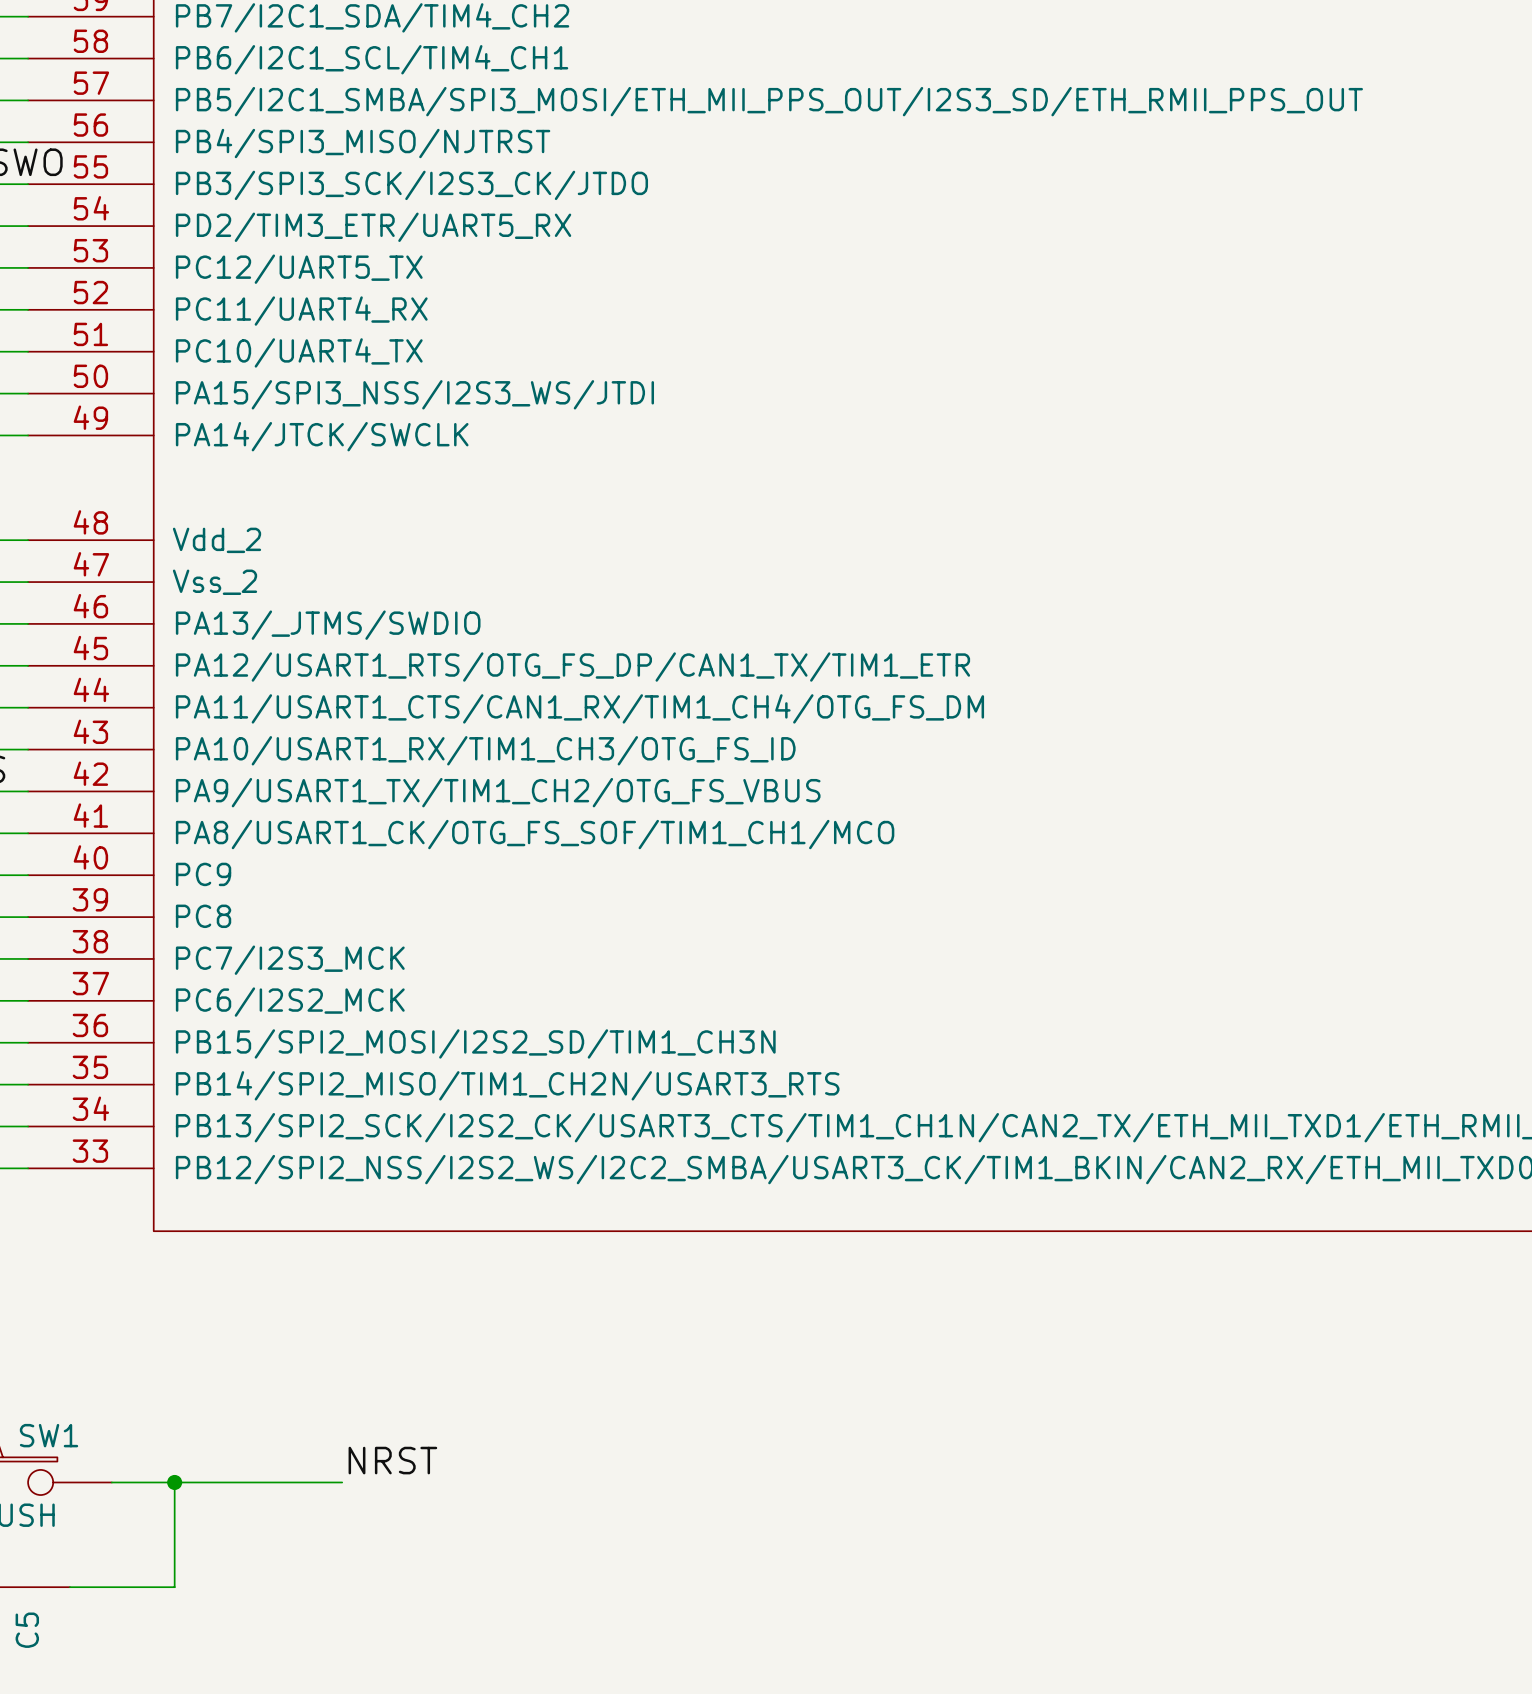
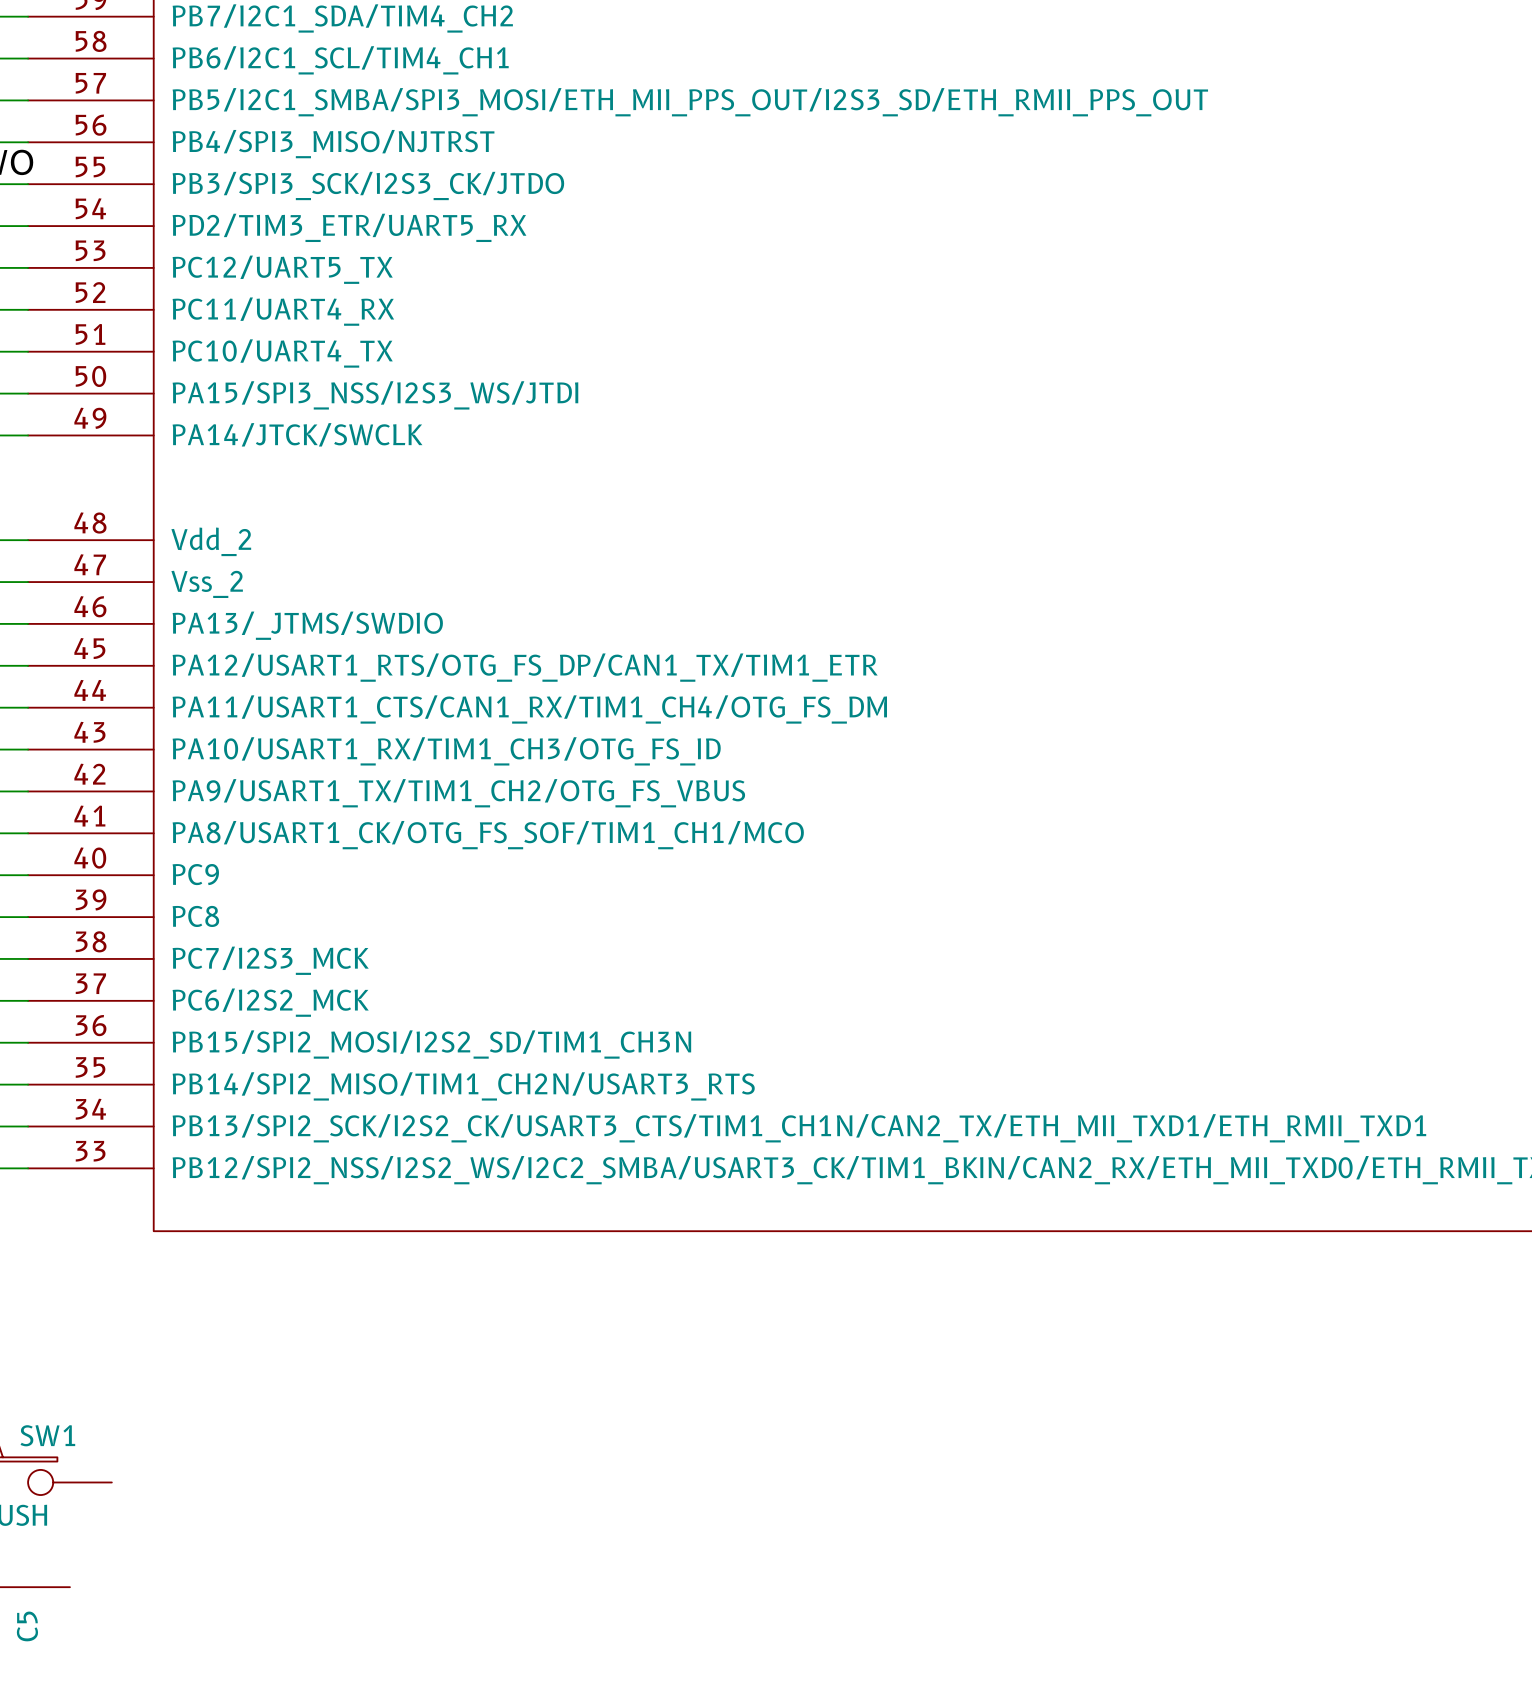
label: NRST (392, 1460) -> none
wire: (111, 1482) (342, 1482) -> none
wire: (174, 1482) (174, 1587) (69, 1587) -> none
junction: (174, 1482) -> none

